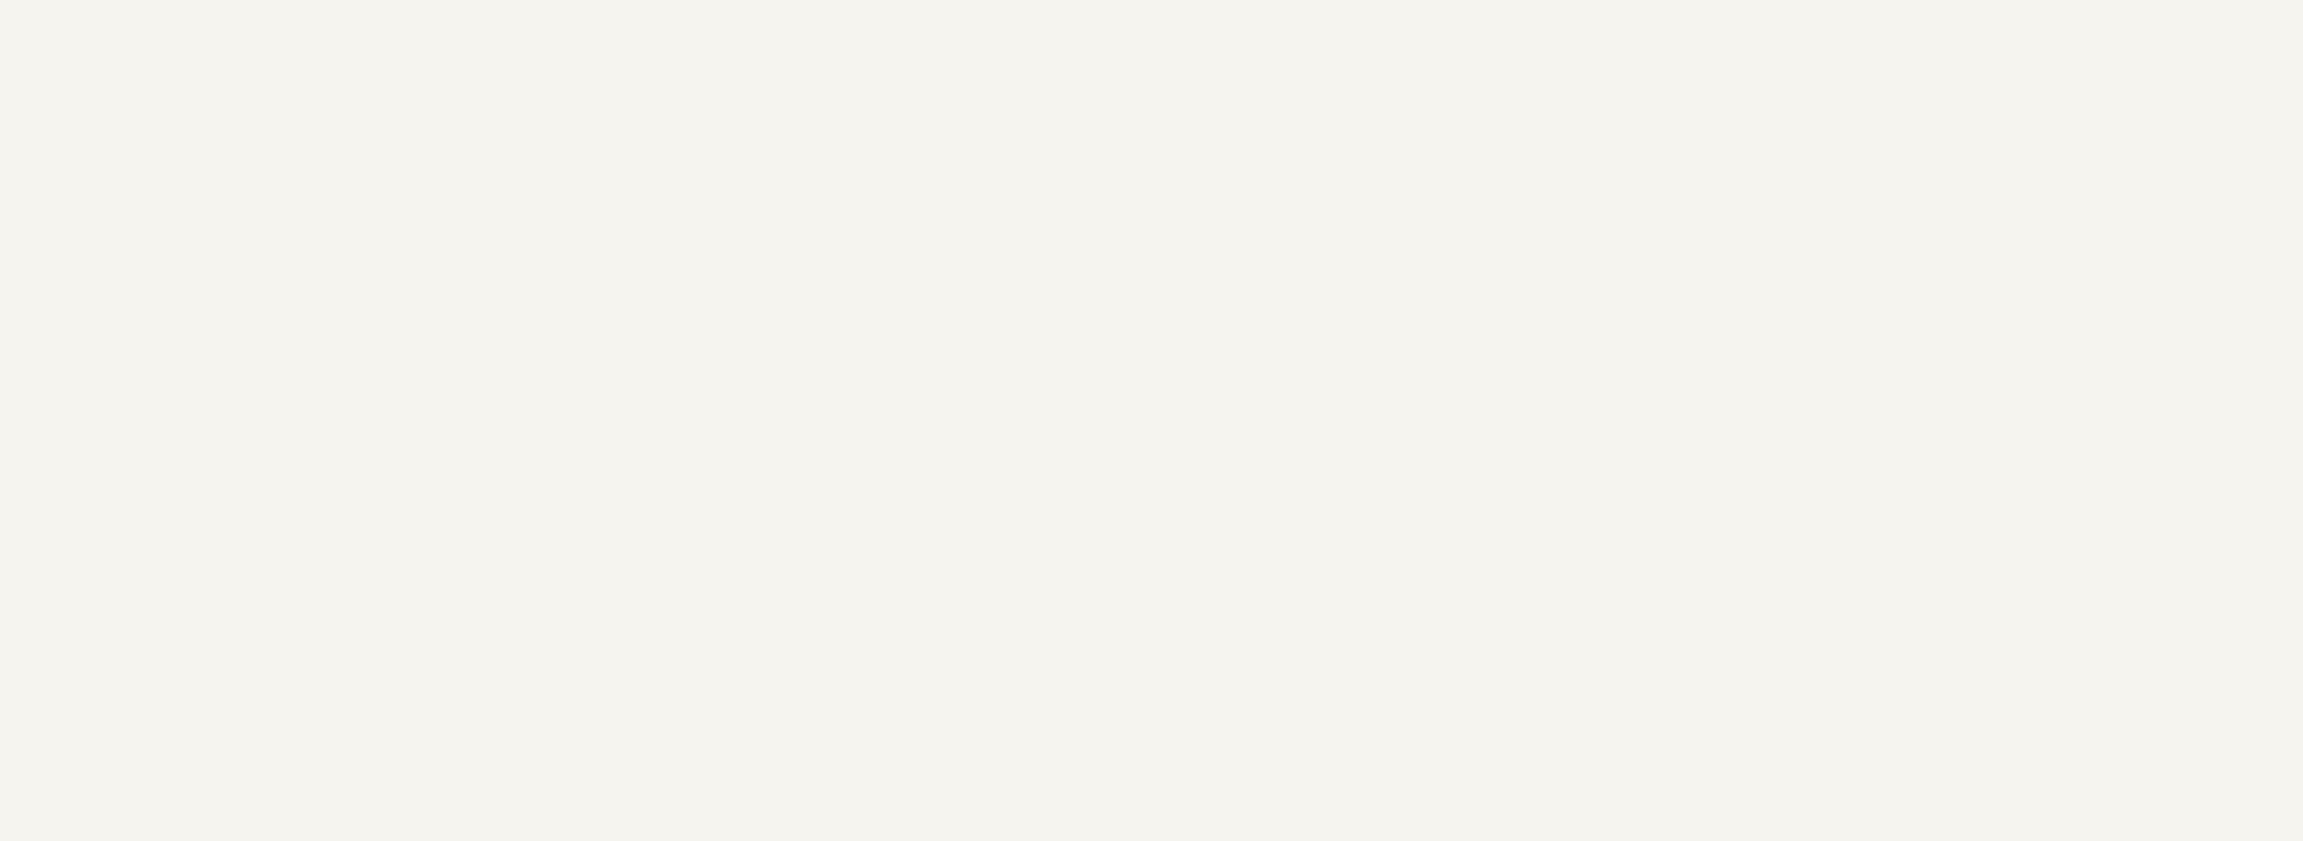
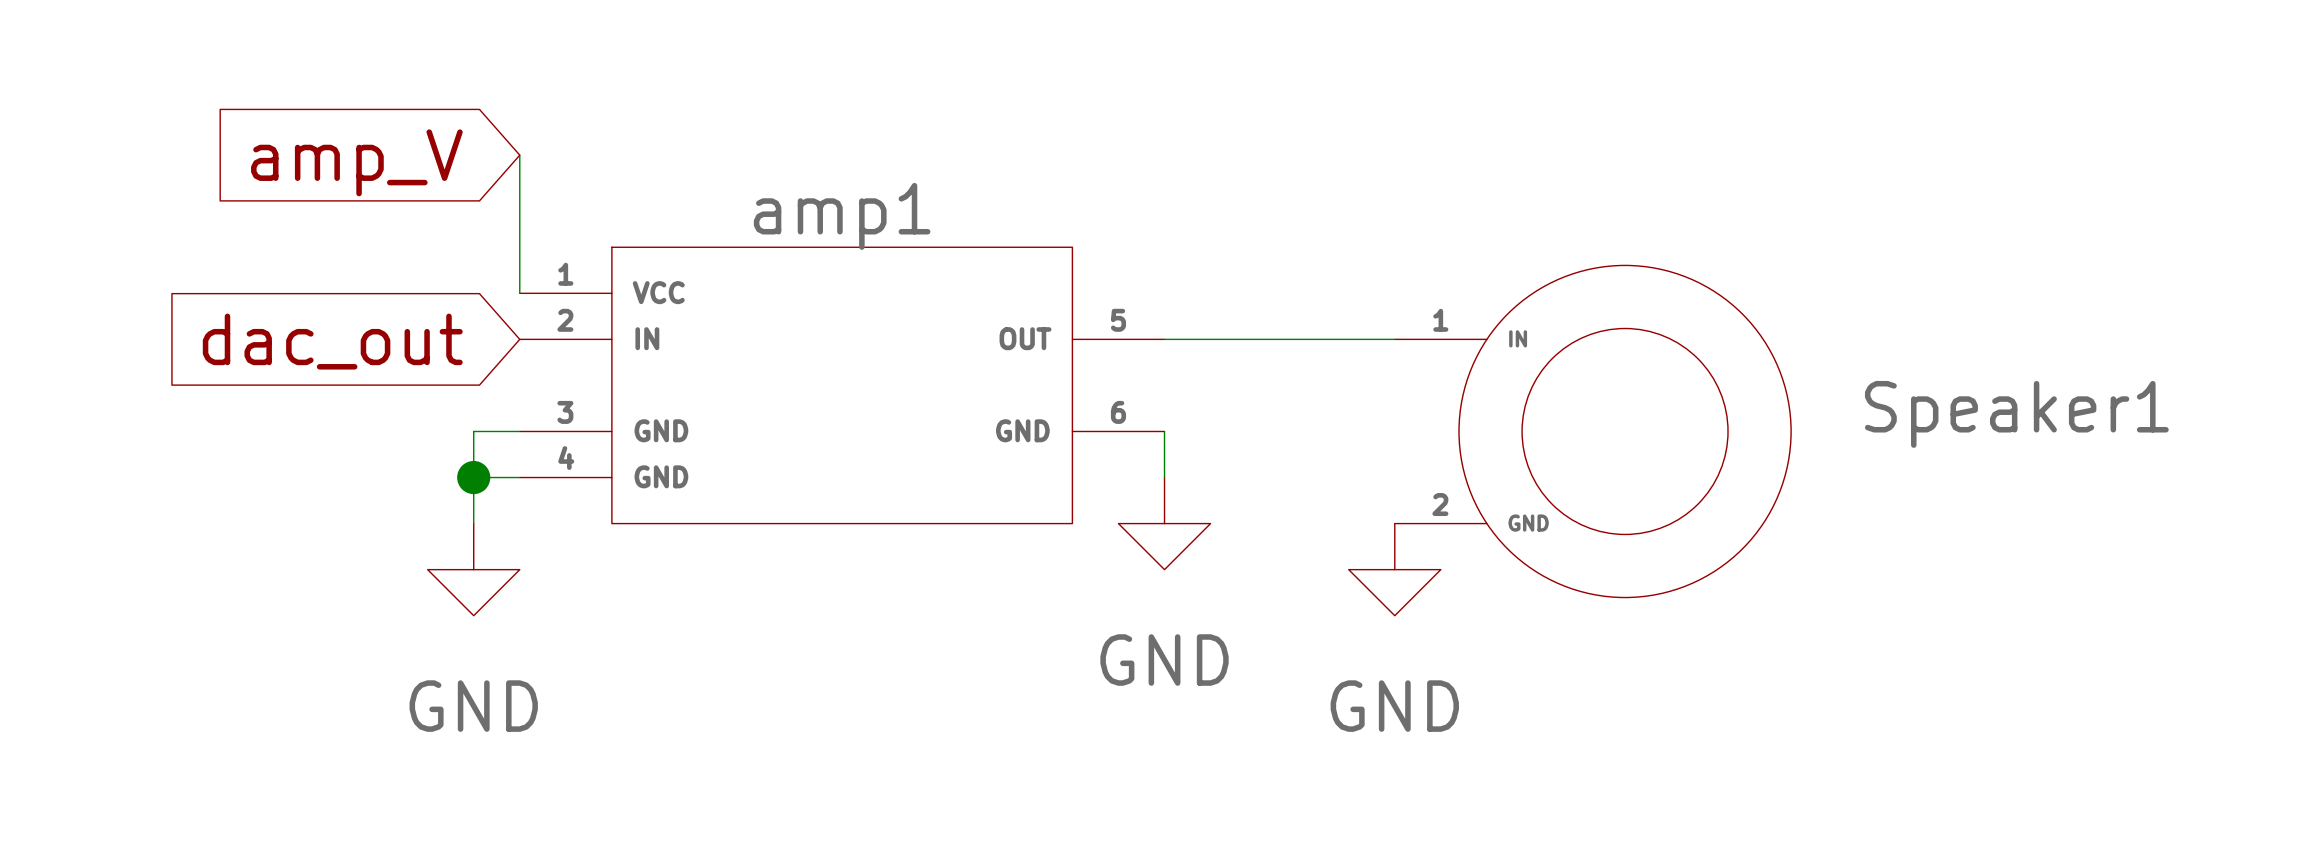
wire: none -> (519, 155) (519, 293)
global label: none -> amp_V (356, 162)
wire: none -> (1164, 339) (1394, 339)
global label: none -> dac_out (332, 341)
amp1: none -> (842, 385)
wire: none -> (519, 431) (473, 431) (473, 523)
wire: none -> (1164, 431) (1164, 477)
Speaker1: none -> (1592, 431)
wire: none -> (473, 477) (519, 477)
junction: none -> (473, 477)
power symbol: none -> GND (1164, 523)
power symbol: none -> GND (473, 569)
power symbol: none -> GND (1394, 569)

